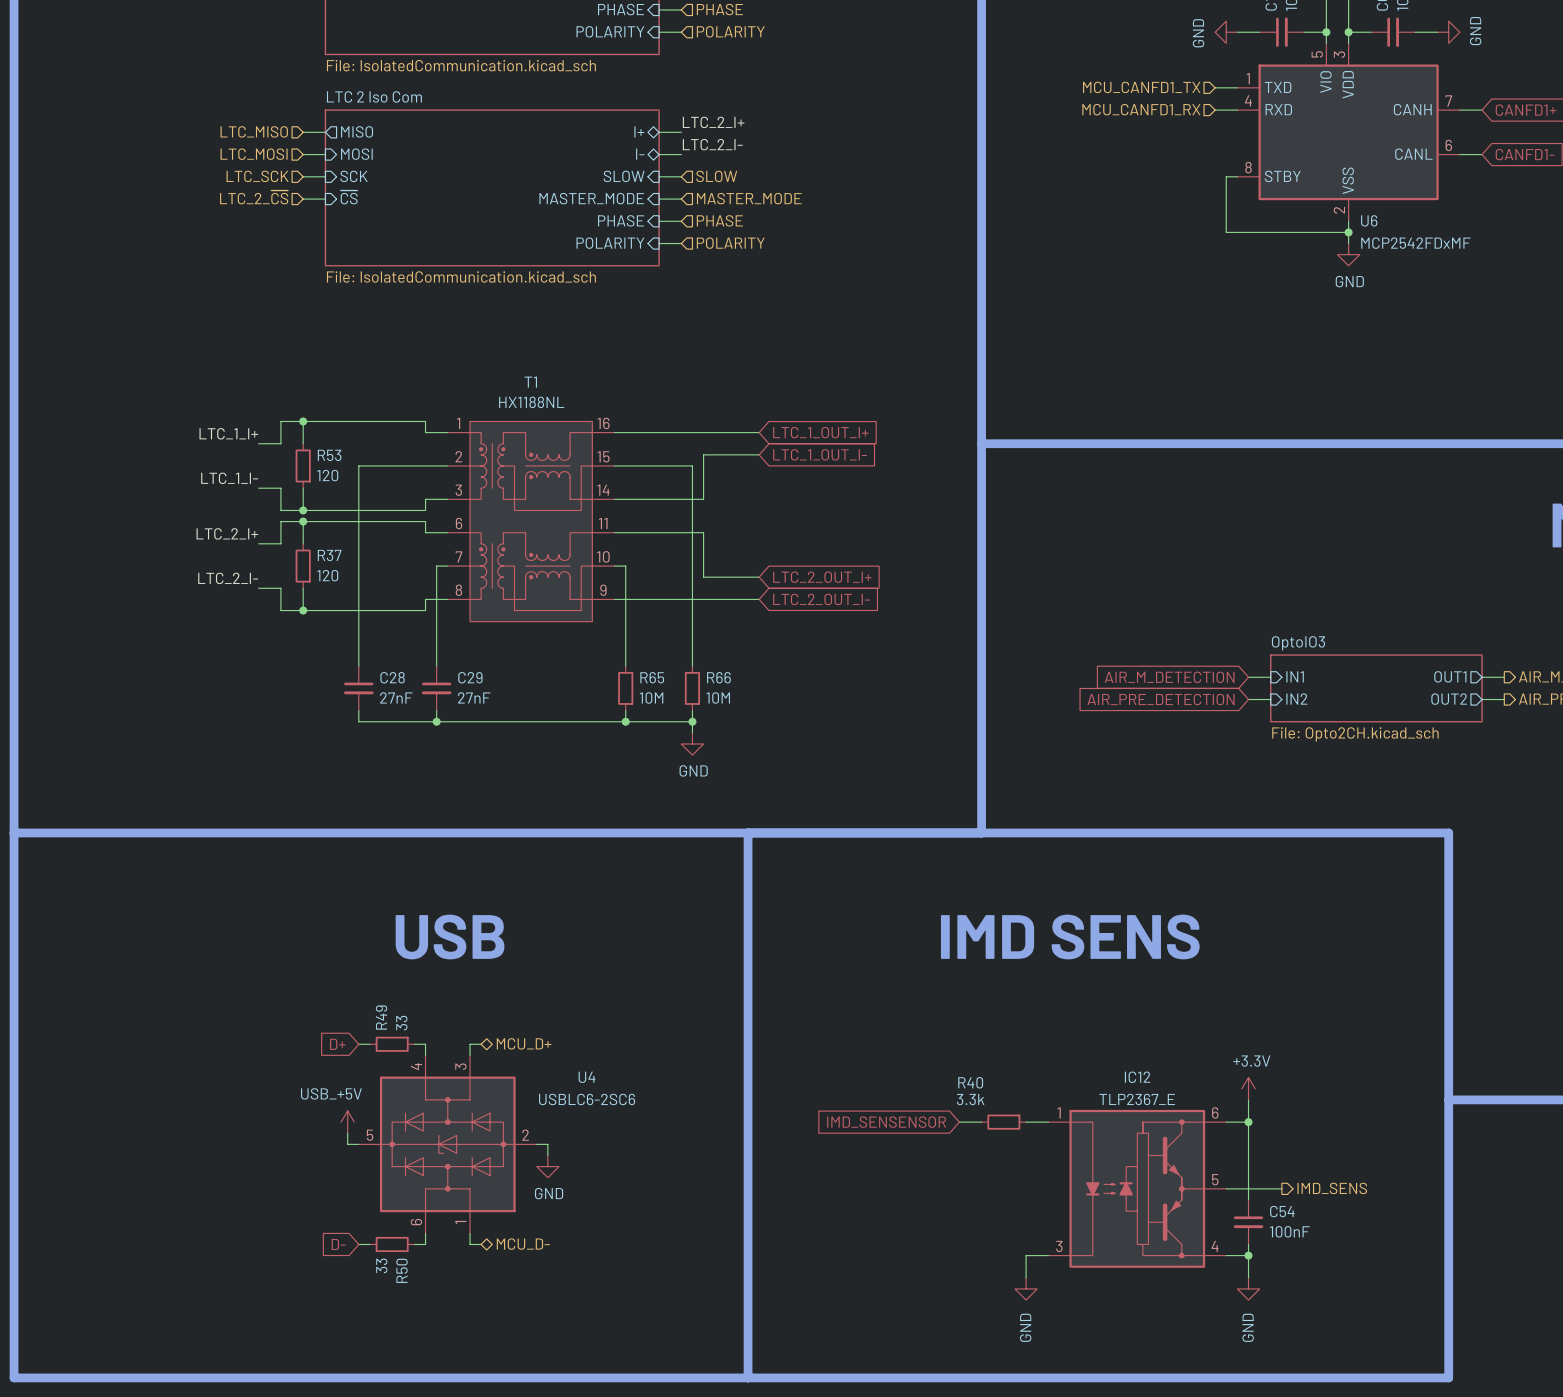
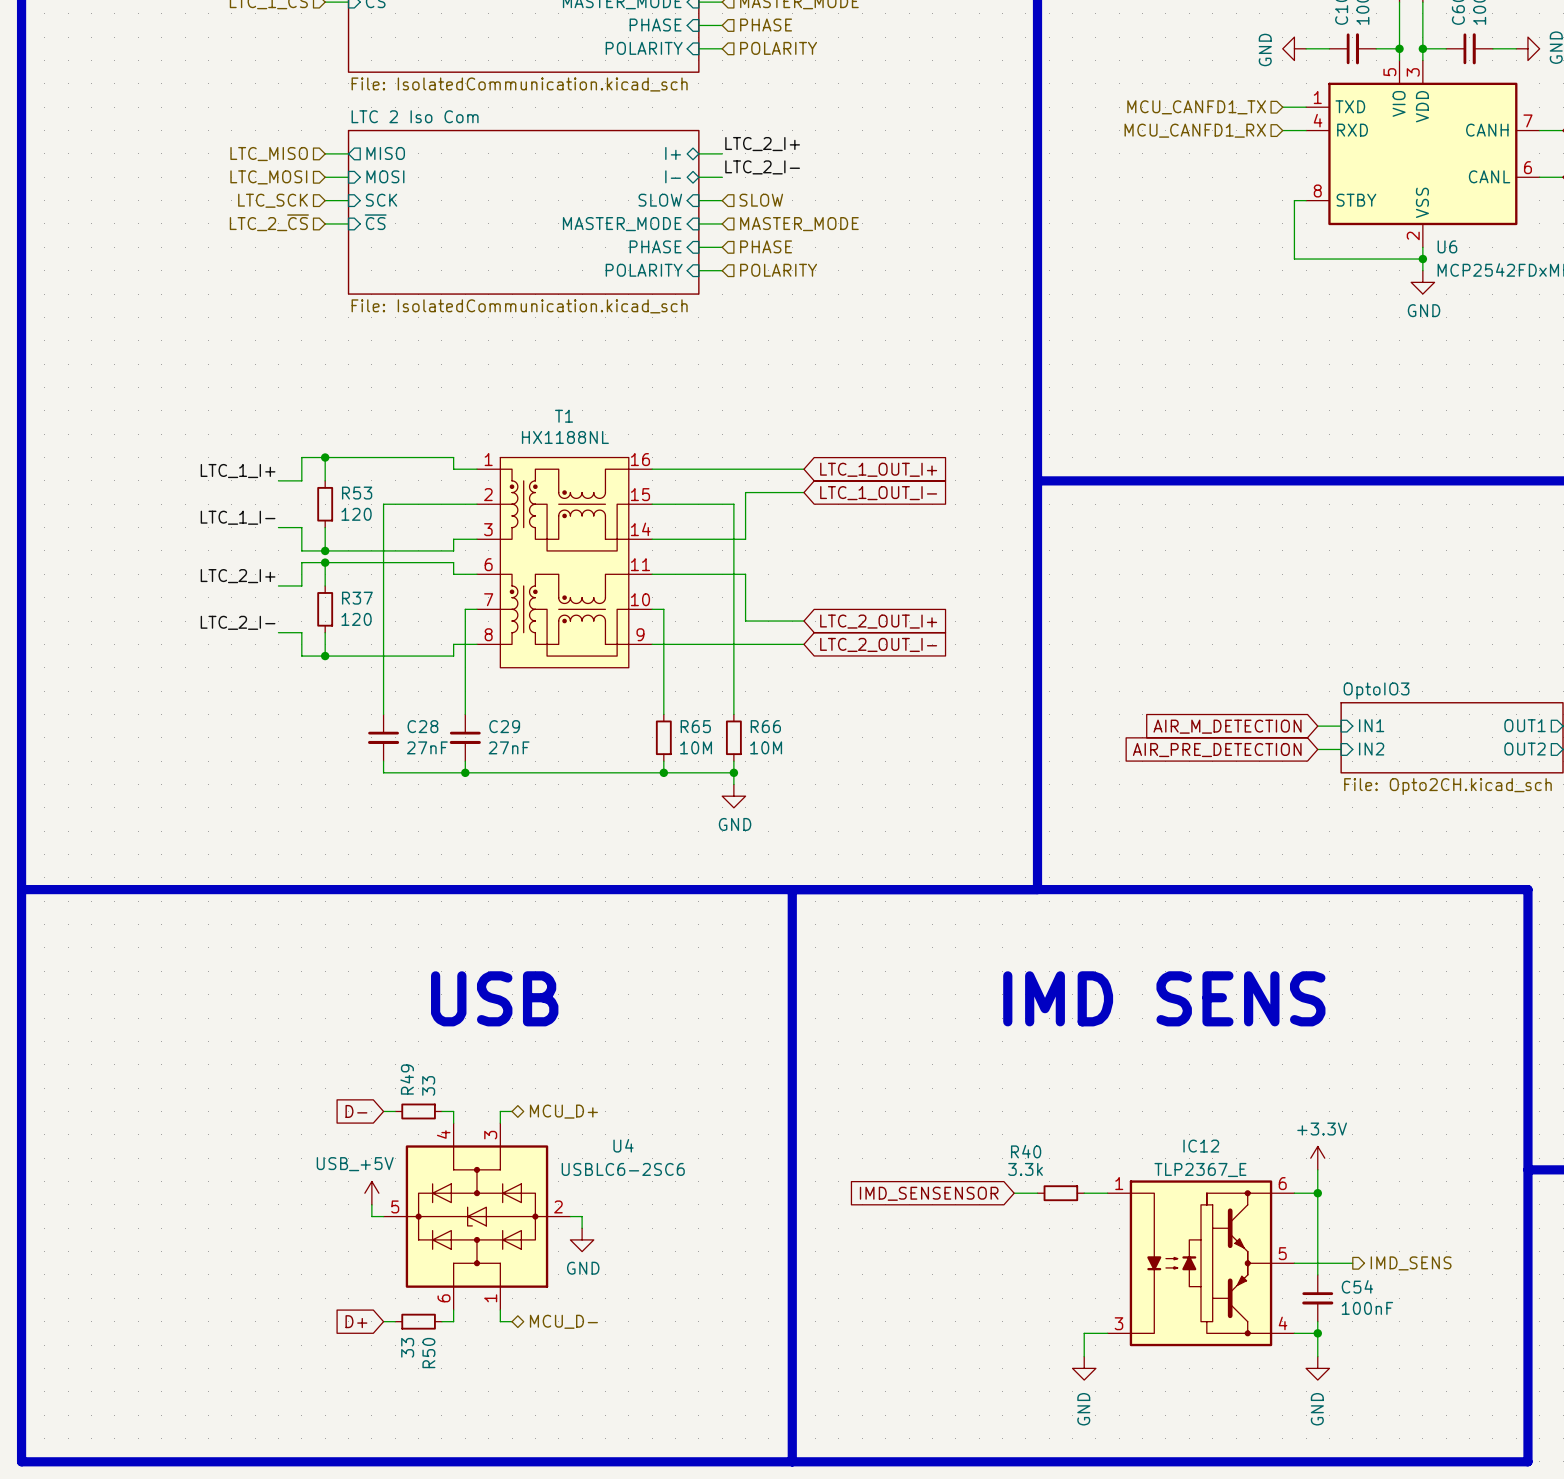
global label: D+ (337, 1044) -> D- (356, 1111)
global label: D- (338, 1244) -> D+ (356, 1321)

